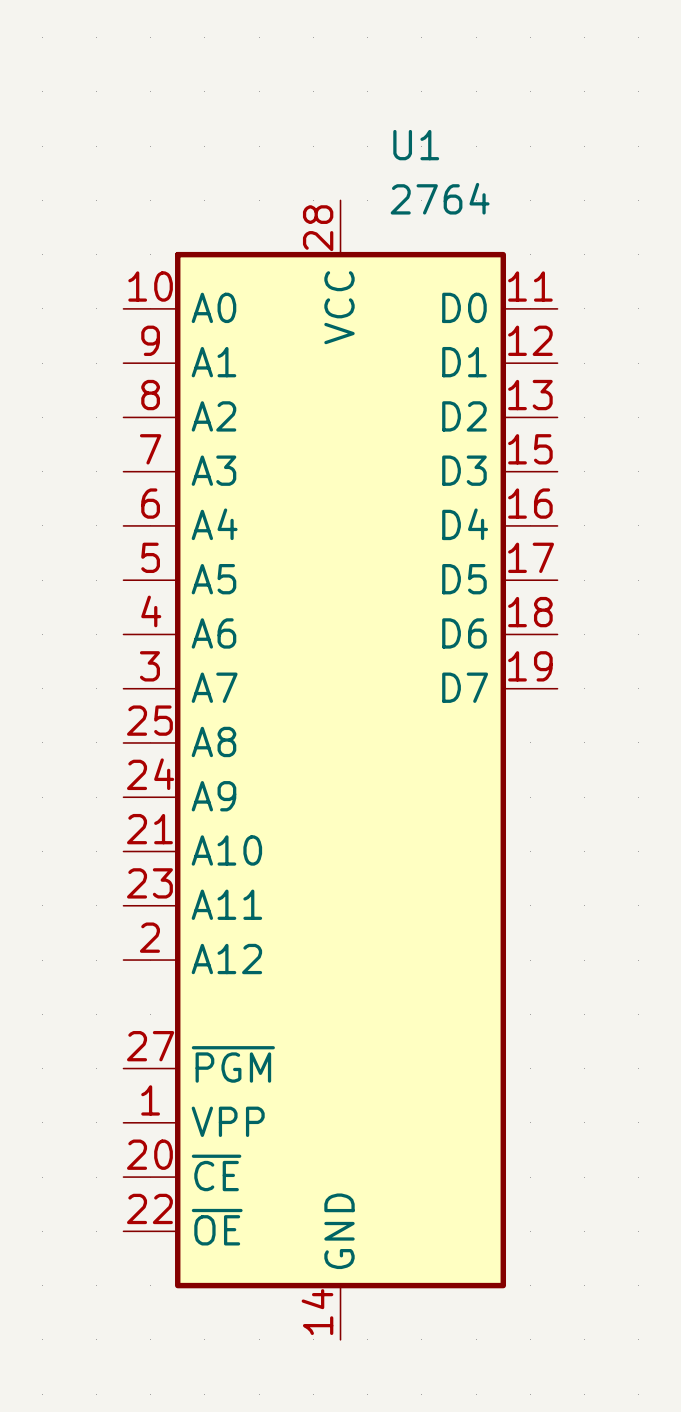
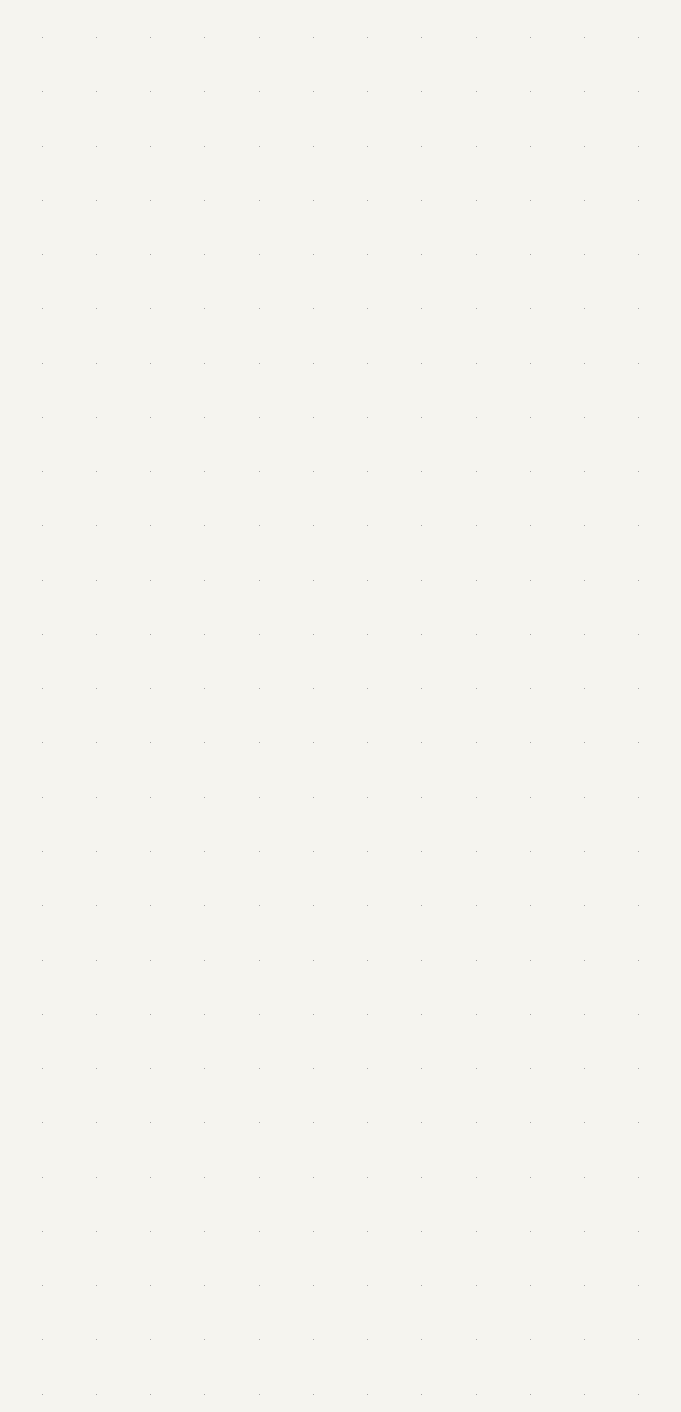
U1: 2764 (340, 770) -> none

